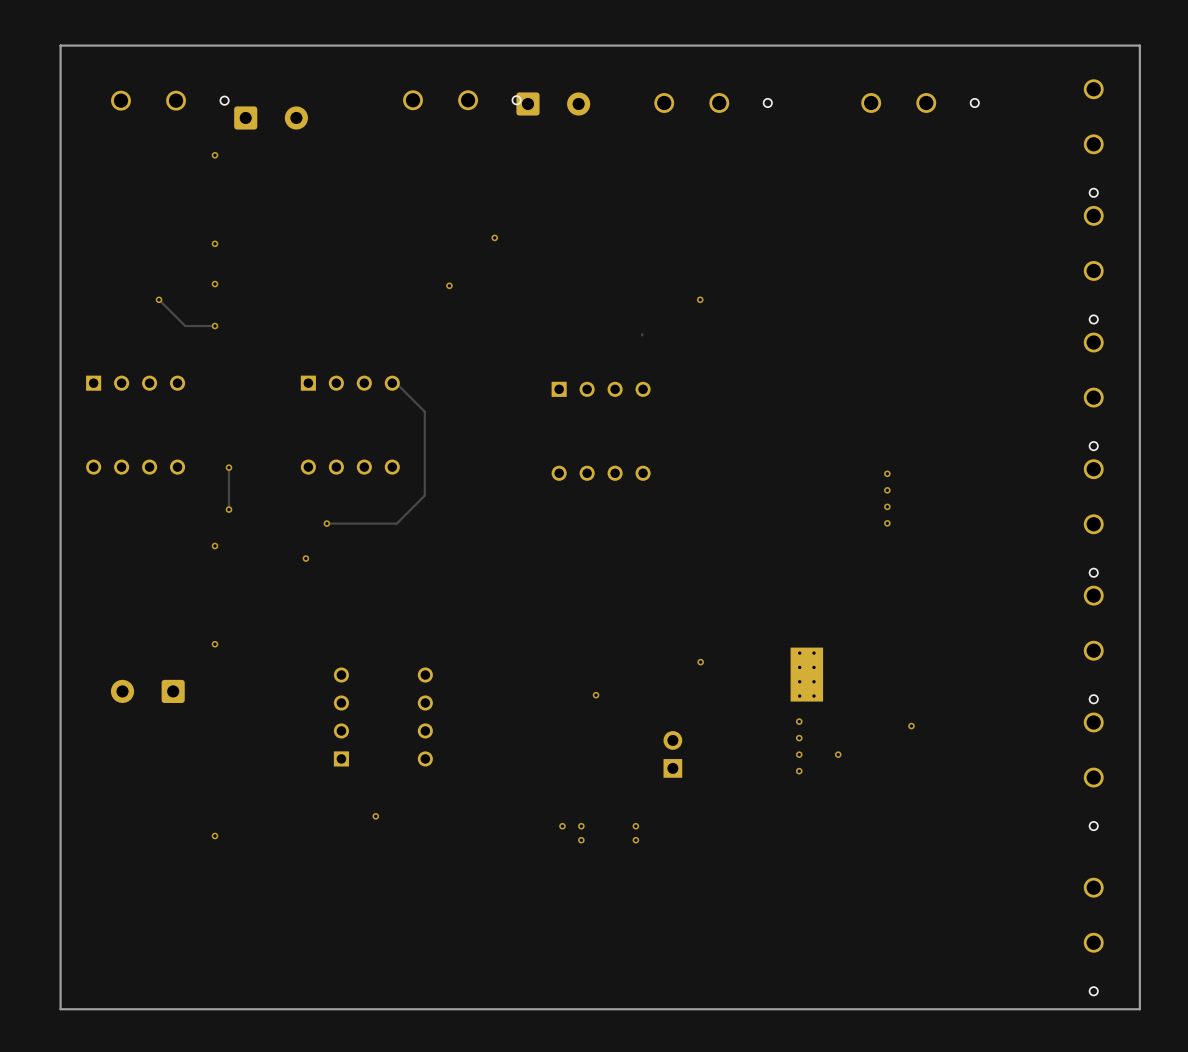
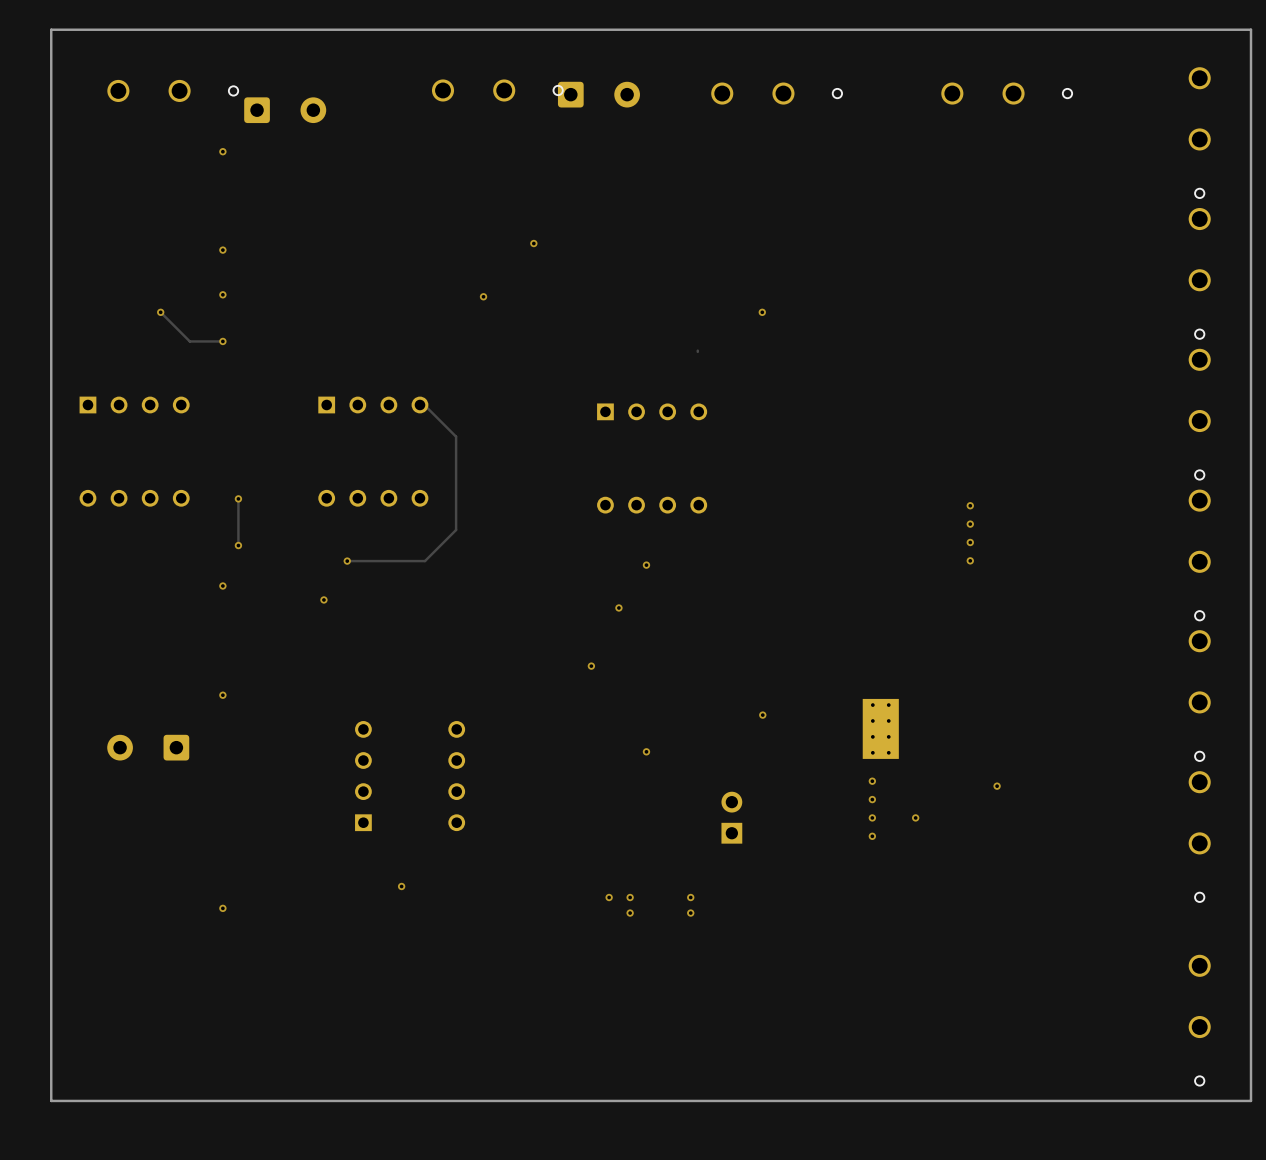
via: none -> (646, 565)
via: none -> (618, 607)
via: none -> (591, 666)

